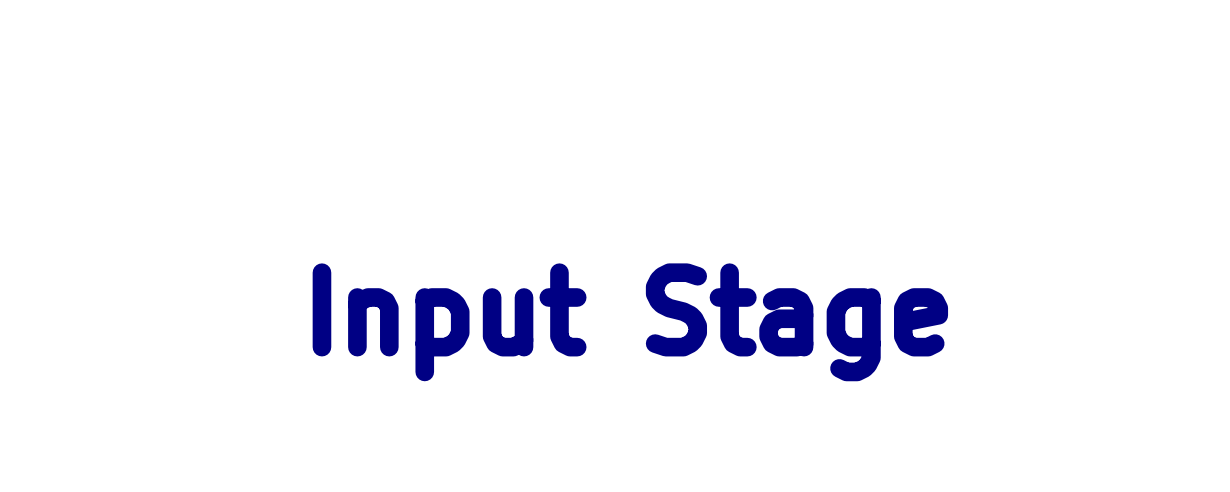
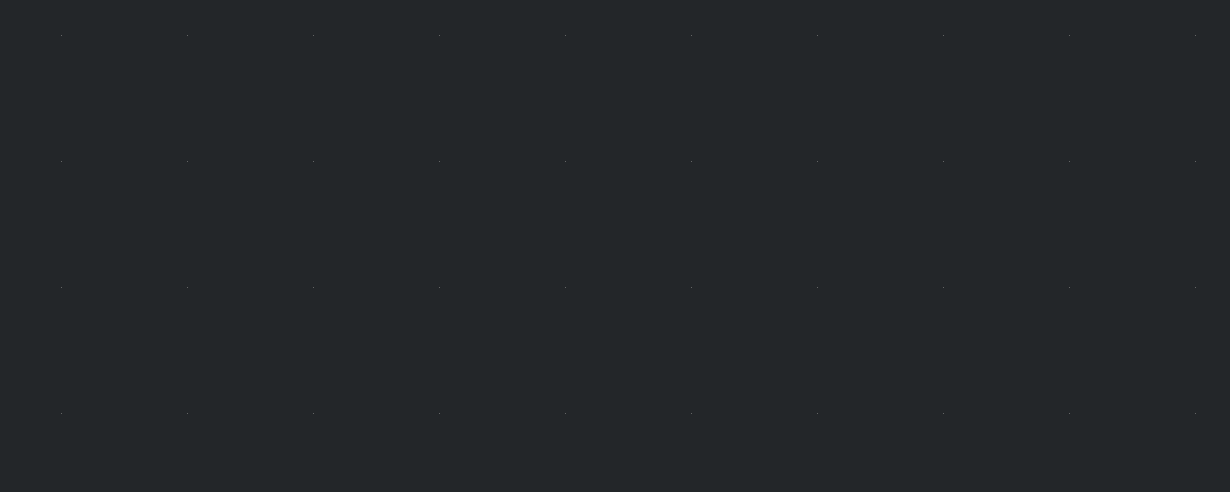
text: Input Stage (630, 322) -> none

